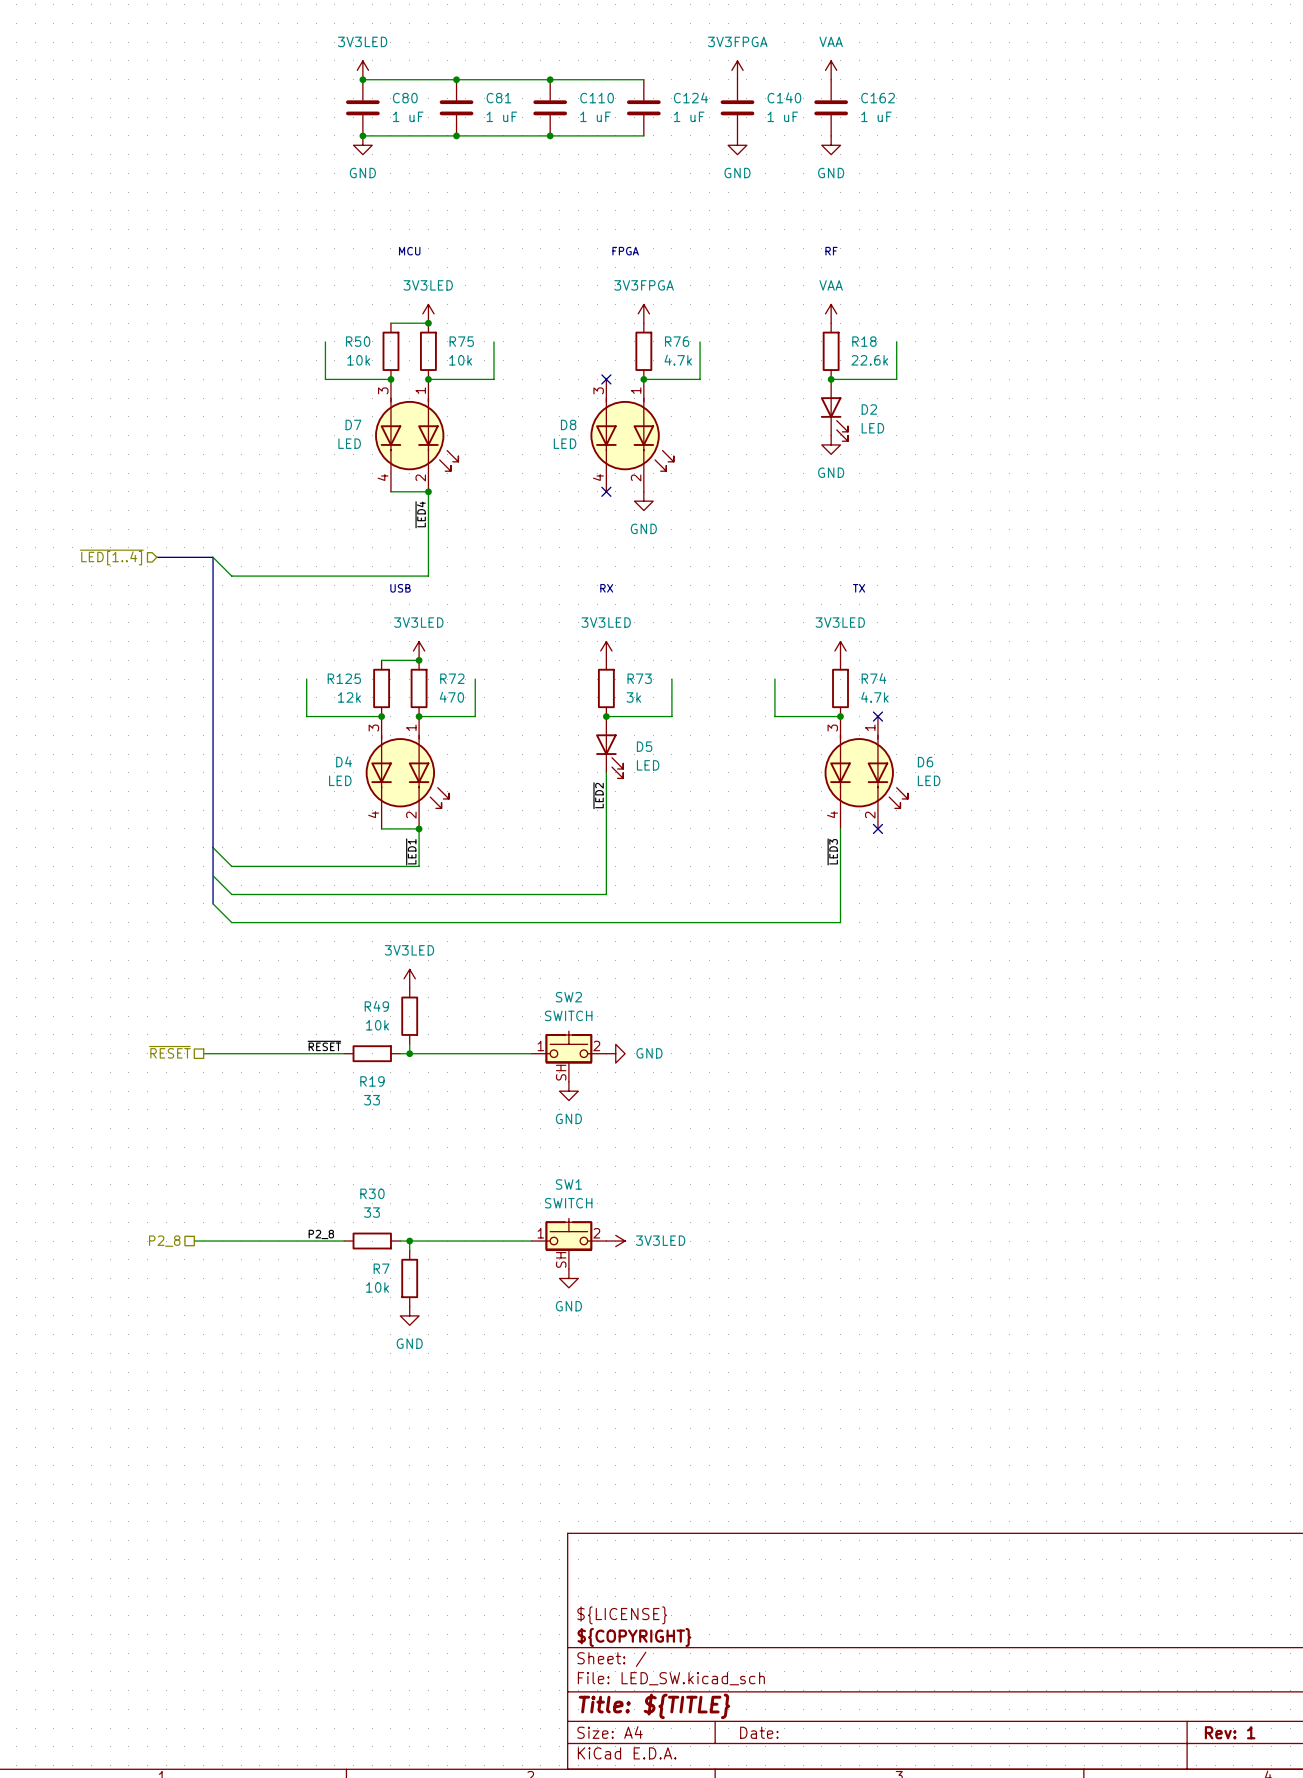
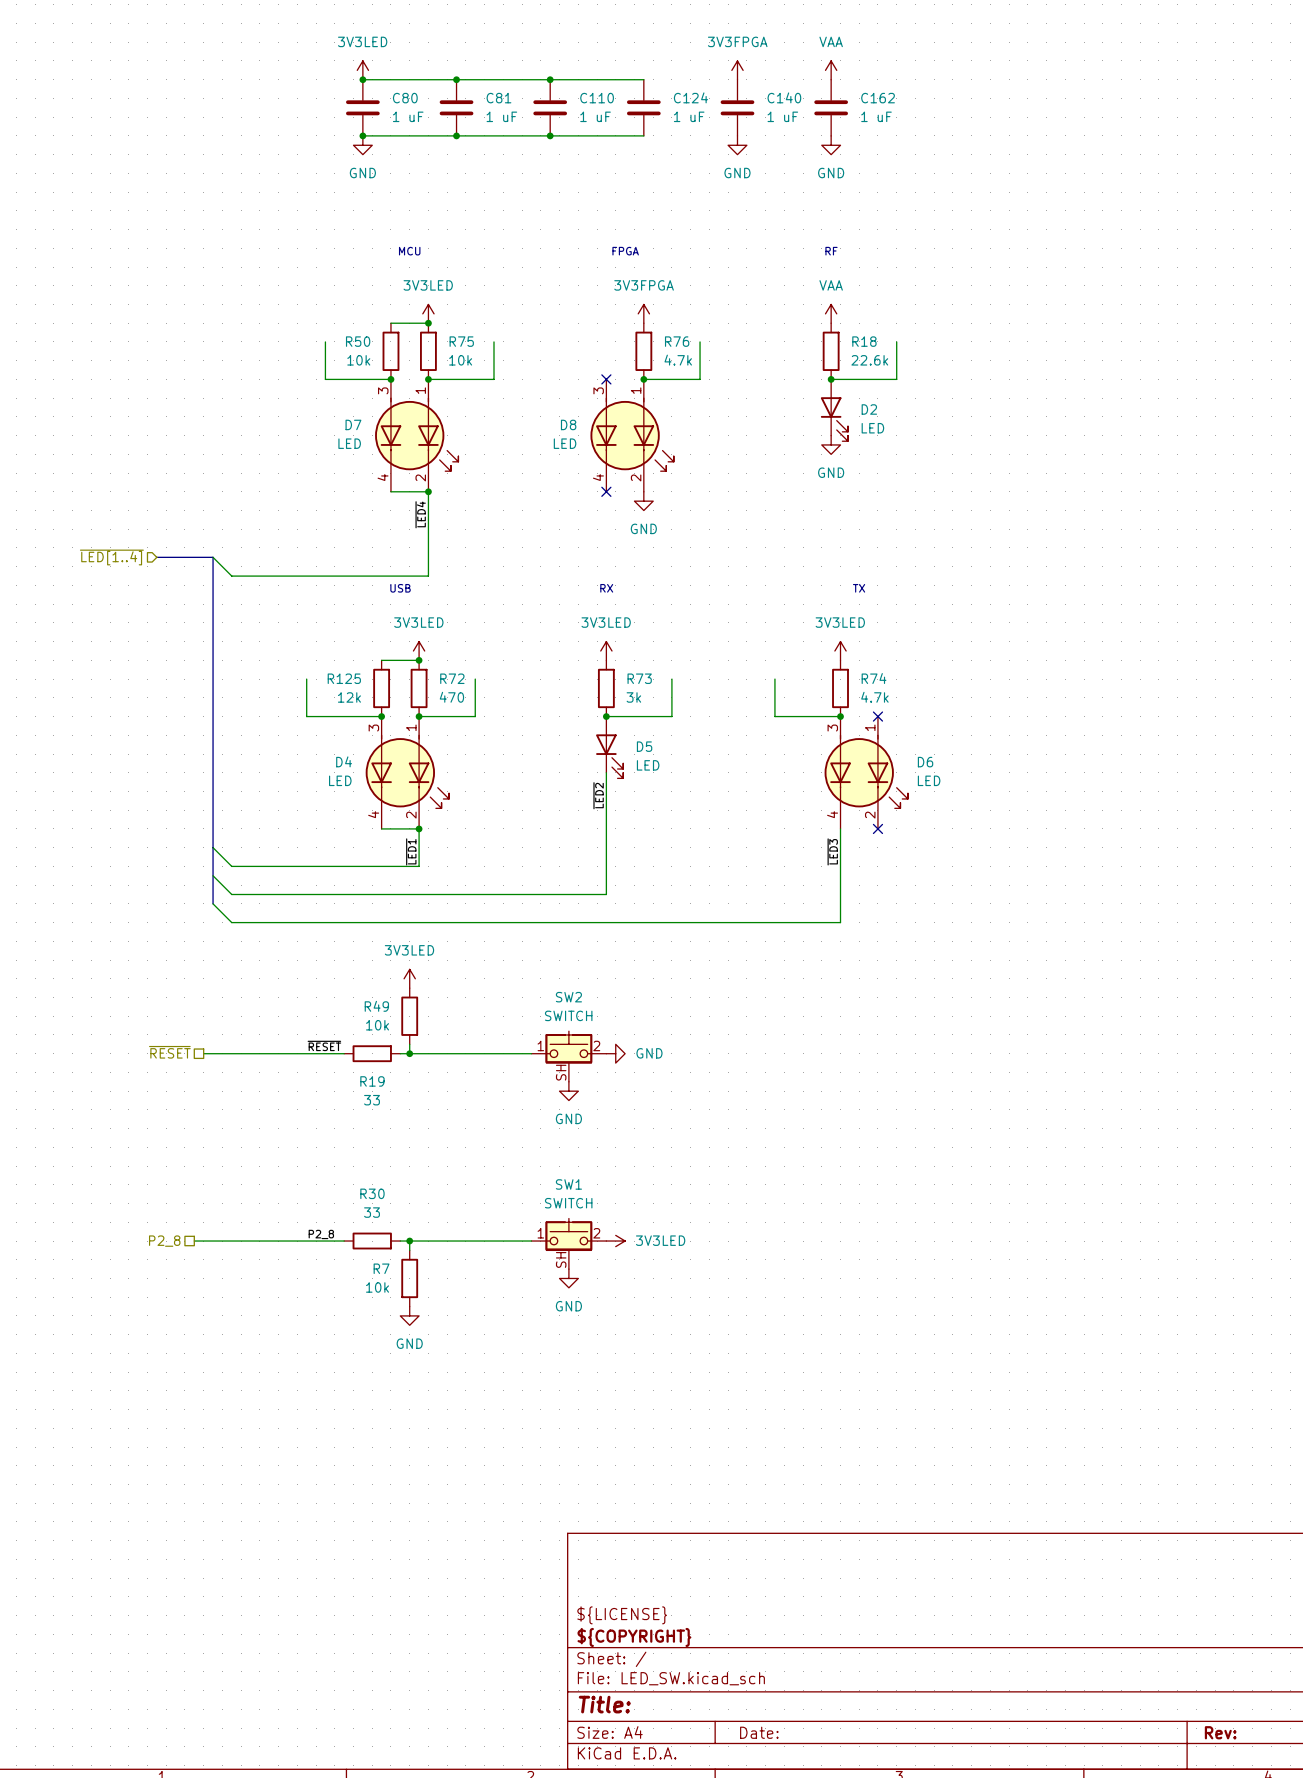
title block: Title: ${TITLE} (654, 1706) -> Title: (604, 1704)
title block: Rev: 1 (1230, 1732) -> Rev: (1220, 1732)

